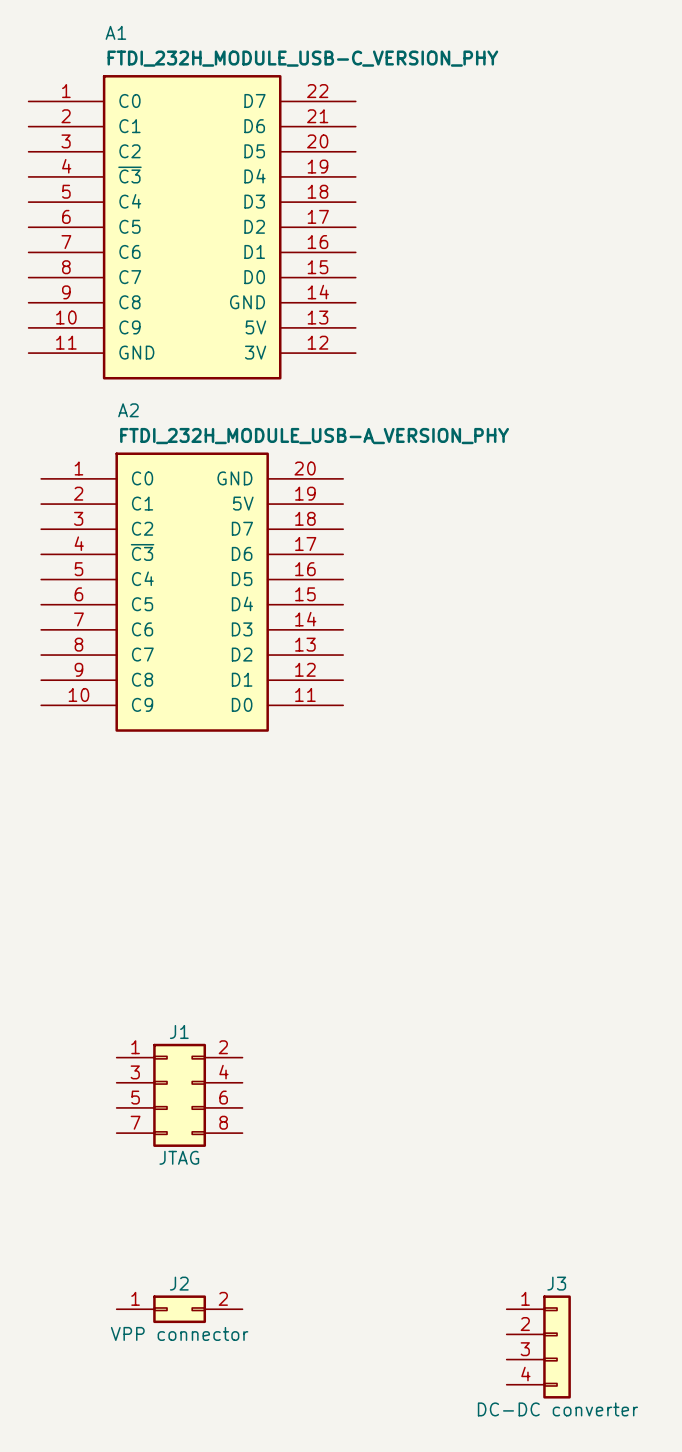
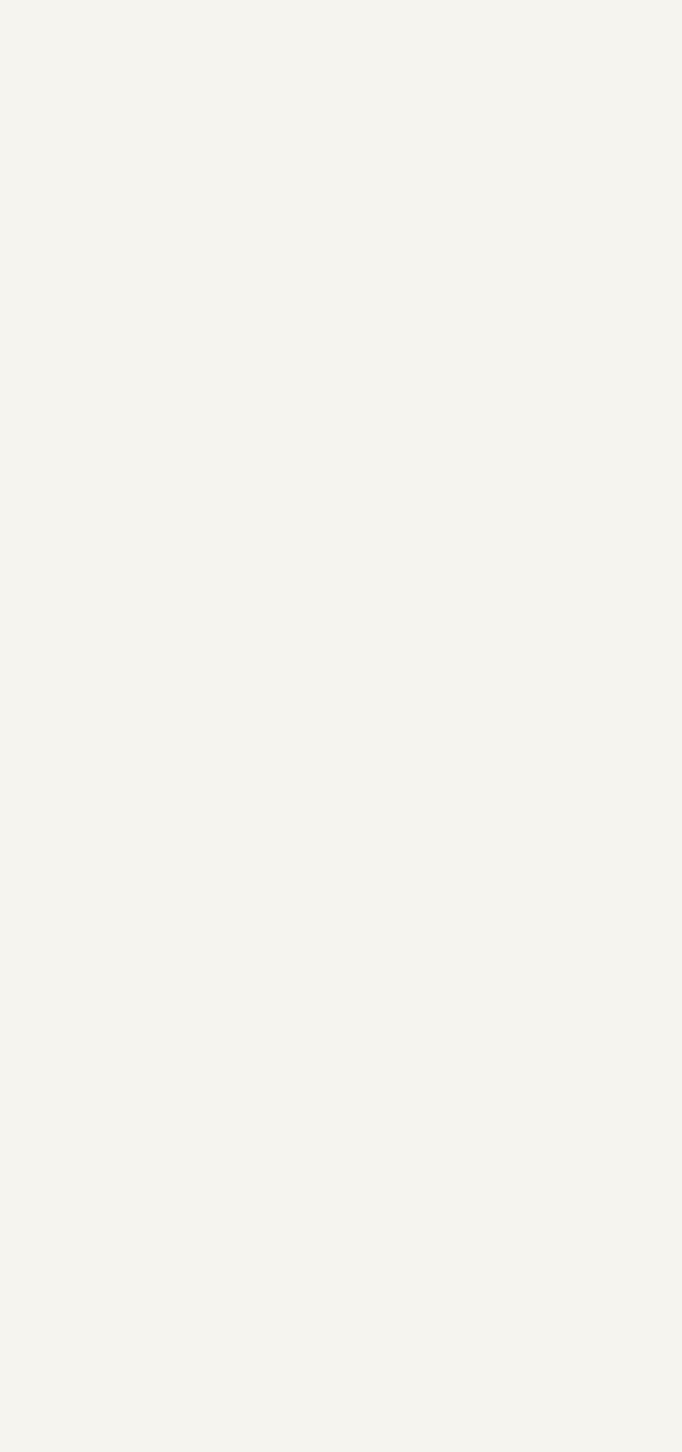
A1: FTDI_232H_MODULE_USB-C_VERSION_PHY (192, 227) -> none
A2: FTDI_232H_MODULE_USB-A_VERSION_PHY (192, 592) -> none
J1: JTAG (179, 1095) -> none
J2: VPP connector (179, 1309) -> none
J3: DC-DC converter (538, 1346) -> none

